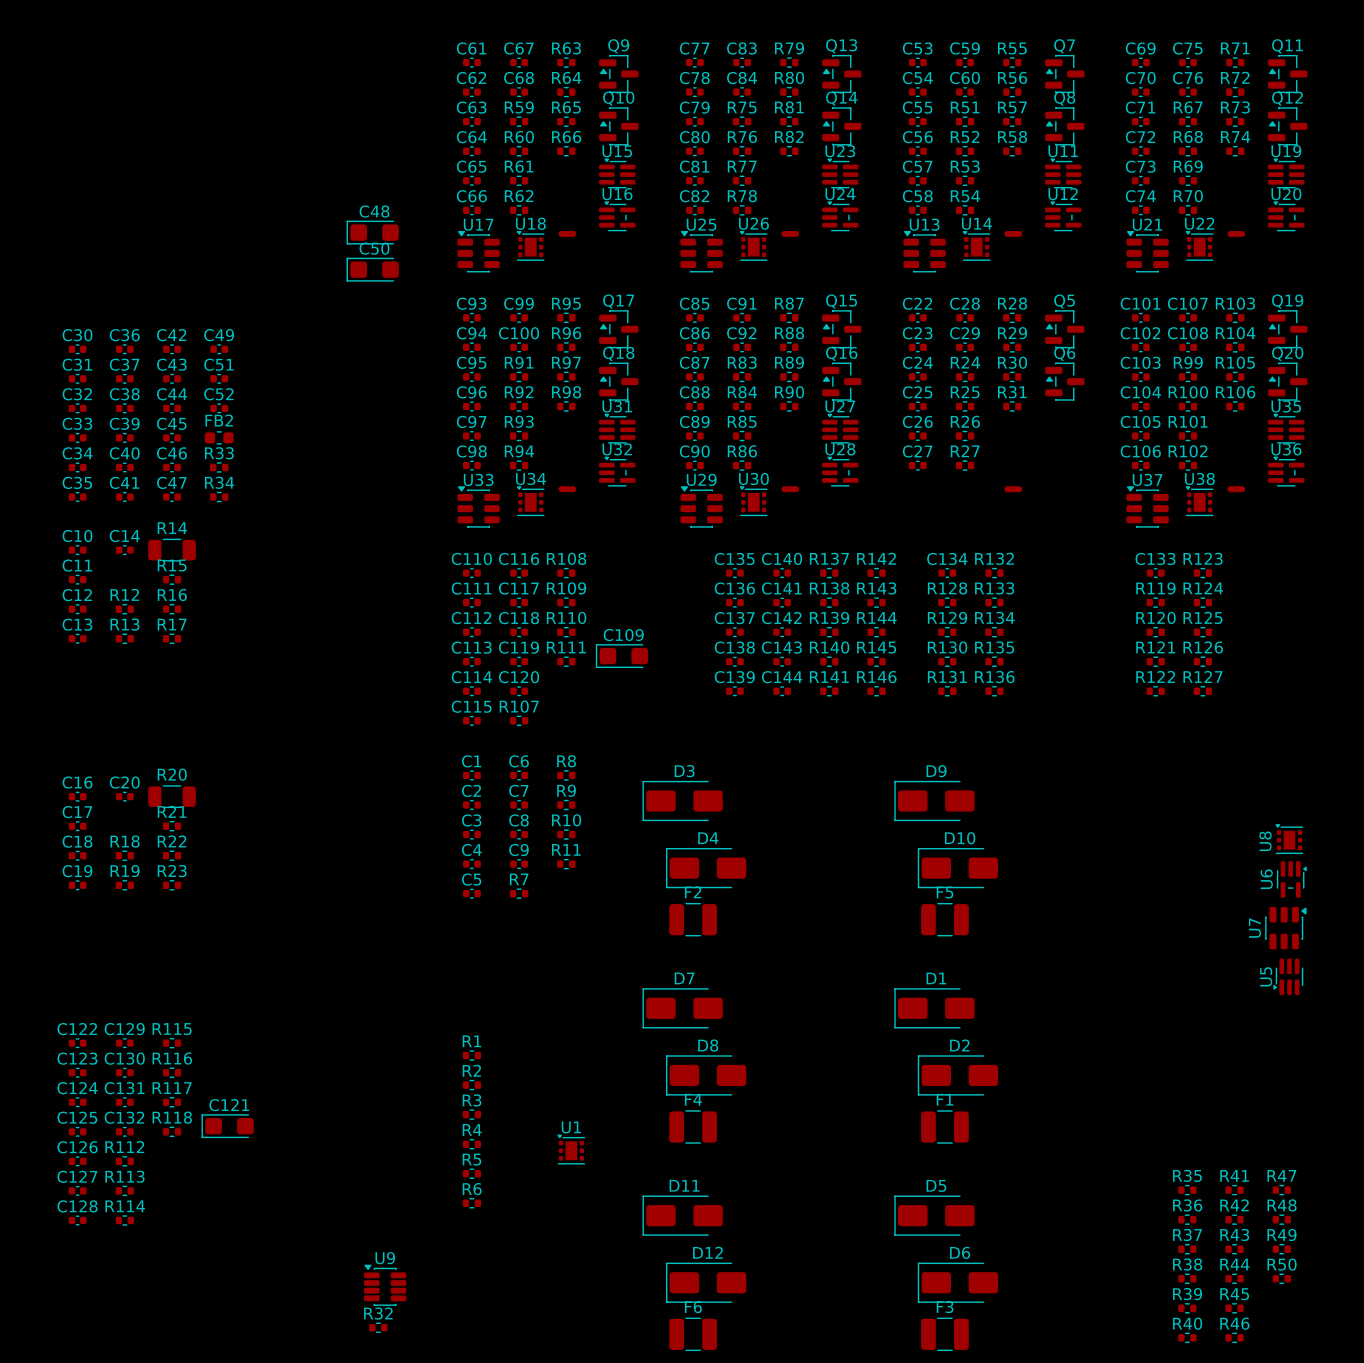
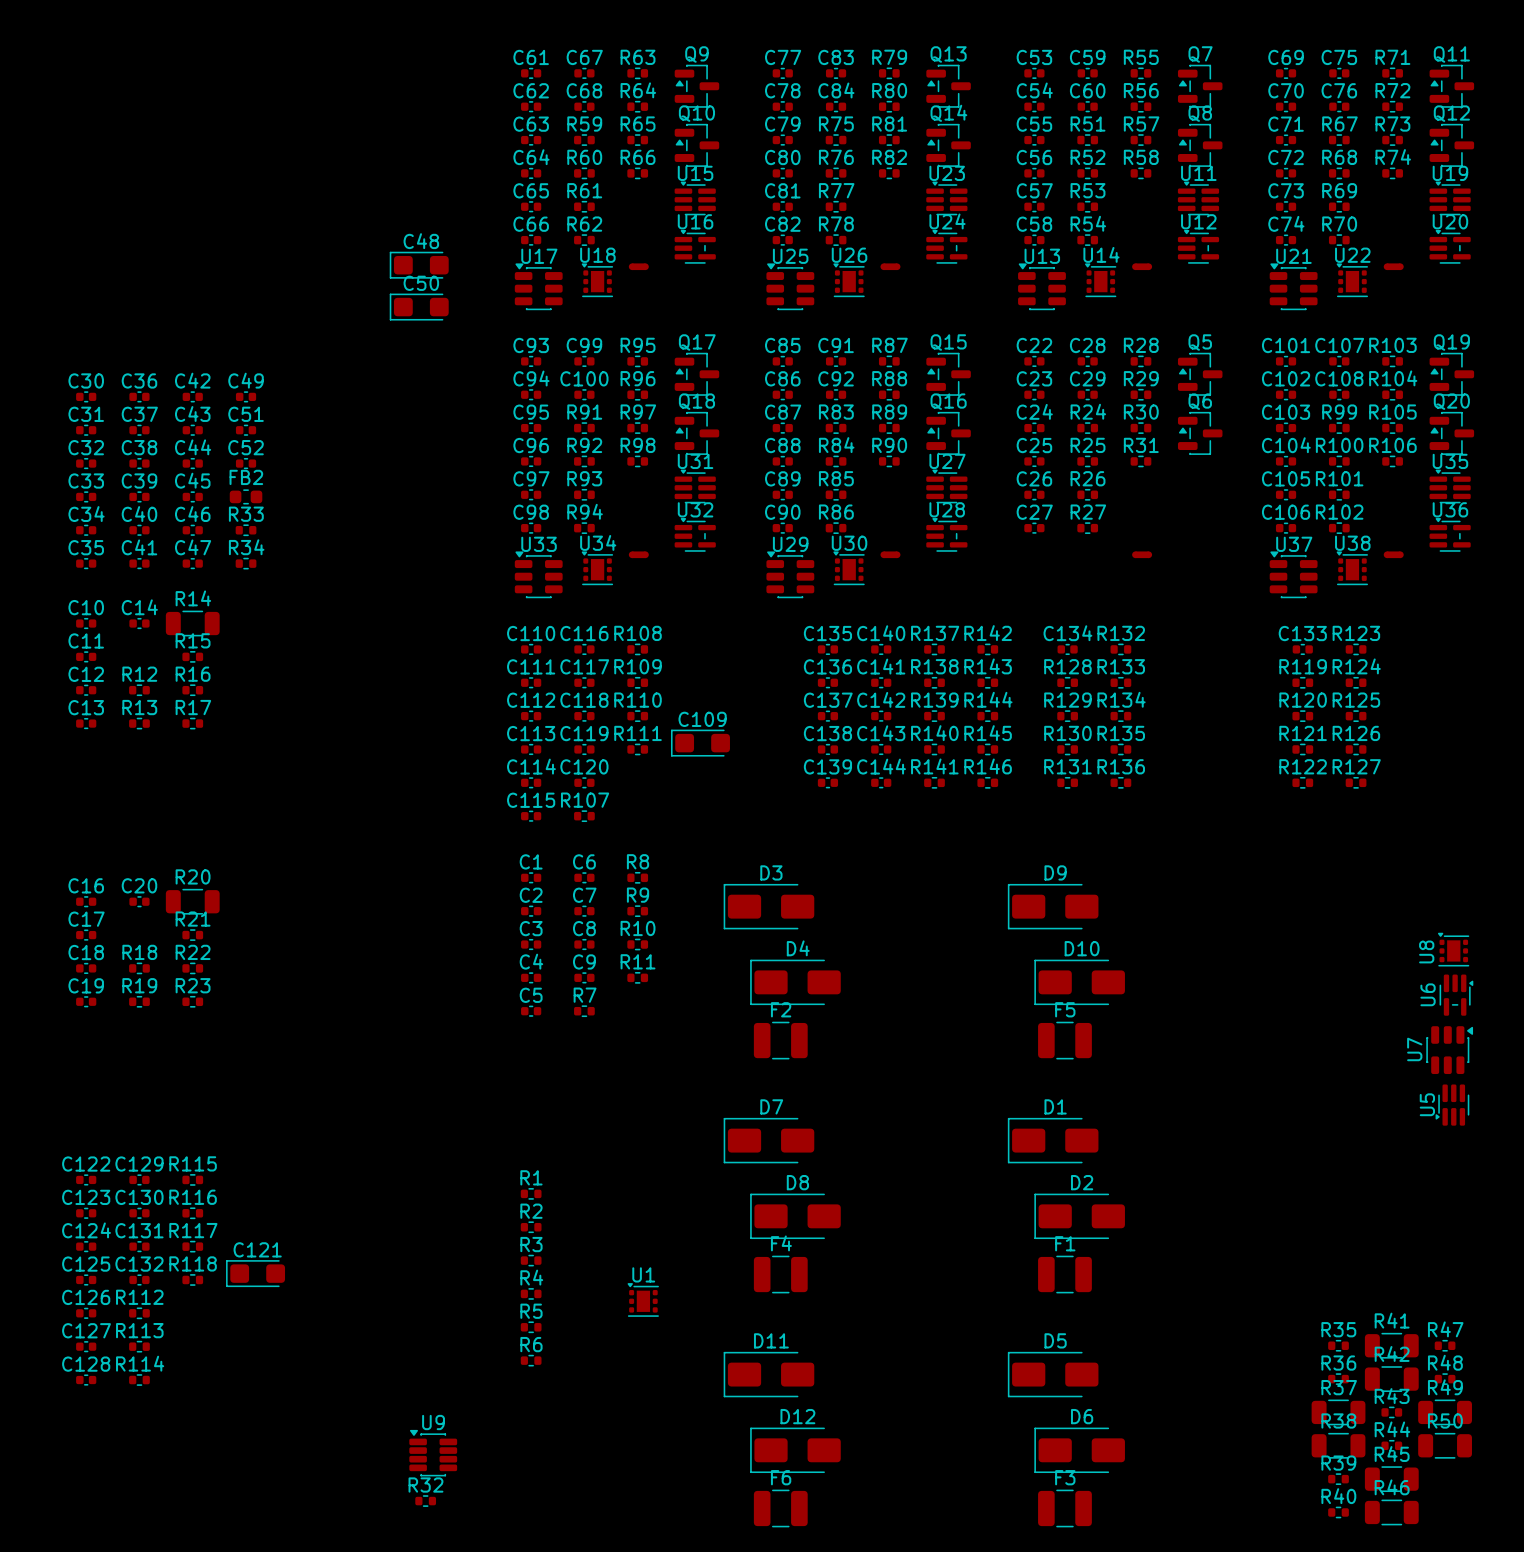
R41 footprint: [1225, 1184, 1244, 1196] -> [1364, 1332, 1419, 1359]
R42 footprint: [1225, 1214, 1244, 1225] -> [1364, 1366, 1419, 1392]
R37 footprint: [1178, 1244, 1197, 1255] -> [1311, 1399, 1366, 1426]
R49 footprint: [1272, 1244, 1291, 1255] -> [1418, 1399, 1472, 1426]
R38 footprint: [1178, 1273, 1197, 1284] -> [1311, 1432, 1366, 1459]
R50 footprint: [1272, 1273, 1291, 1284] -> [1418, 1432, 1472, 1459]
R45 footprint: [1225, 1303, 1244, 1314] -> [1364, 1466, 1419, 1493]
R46 footprint: [1225, 1332, 1244, 1344] -> [1364, 1499, 1419, 1526]

